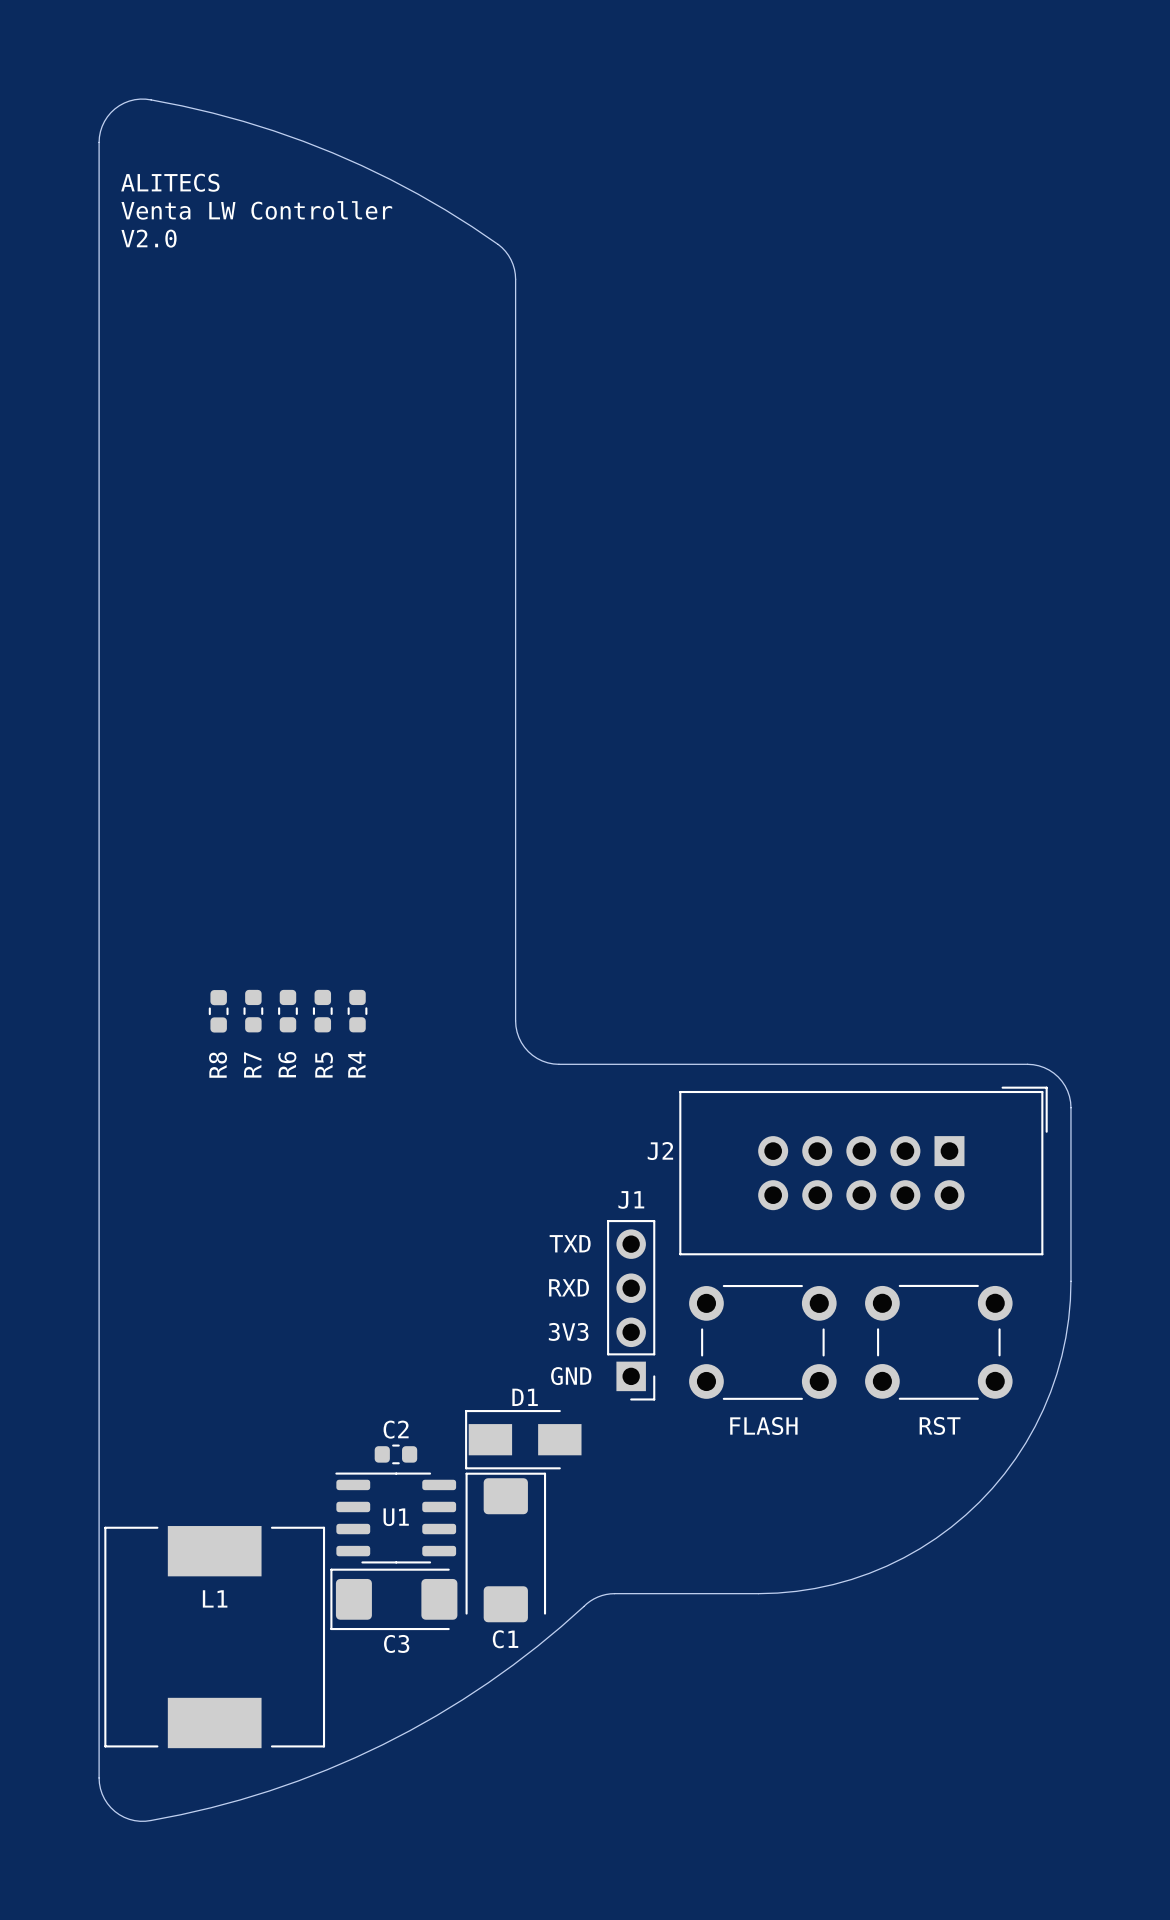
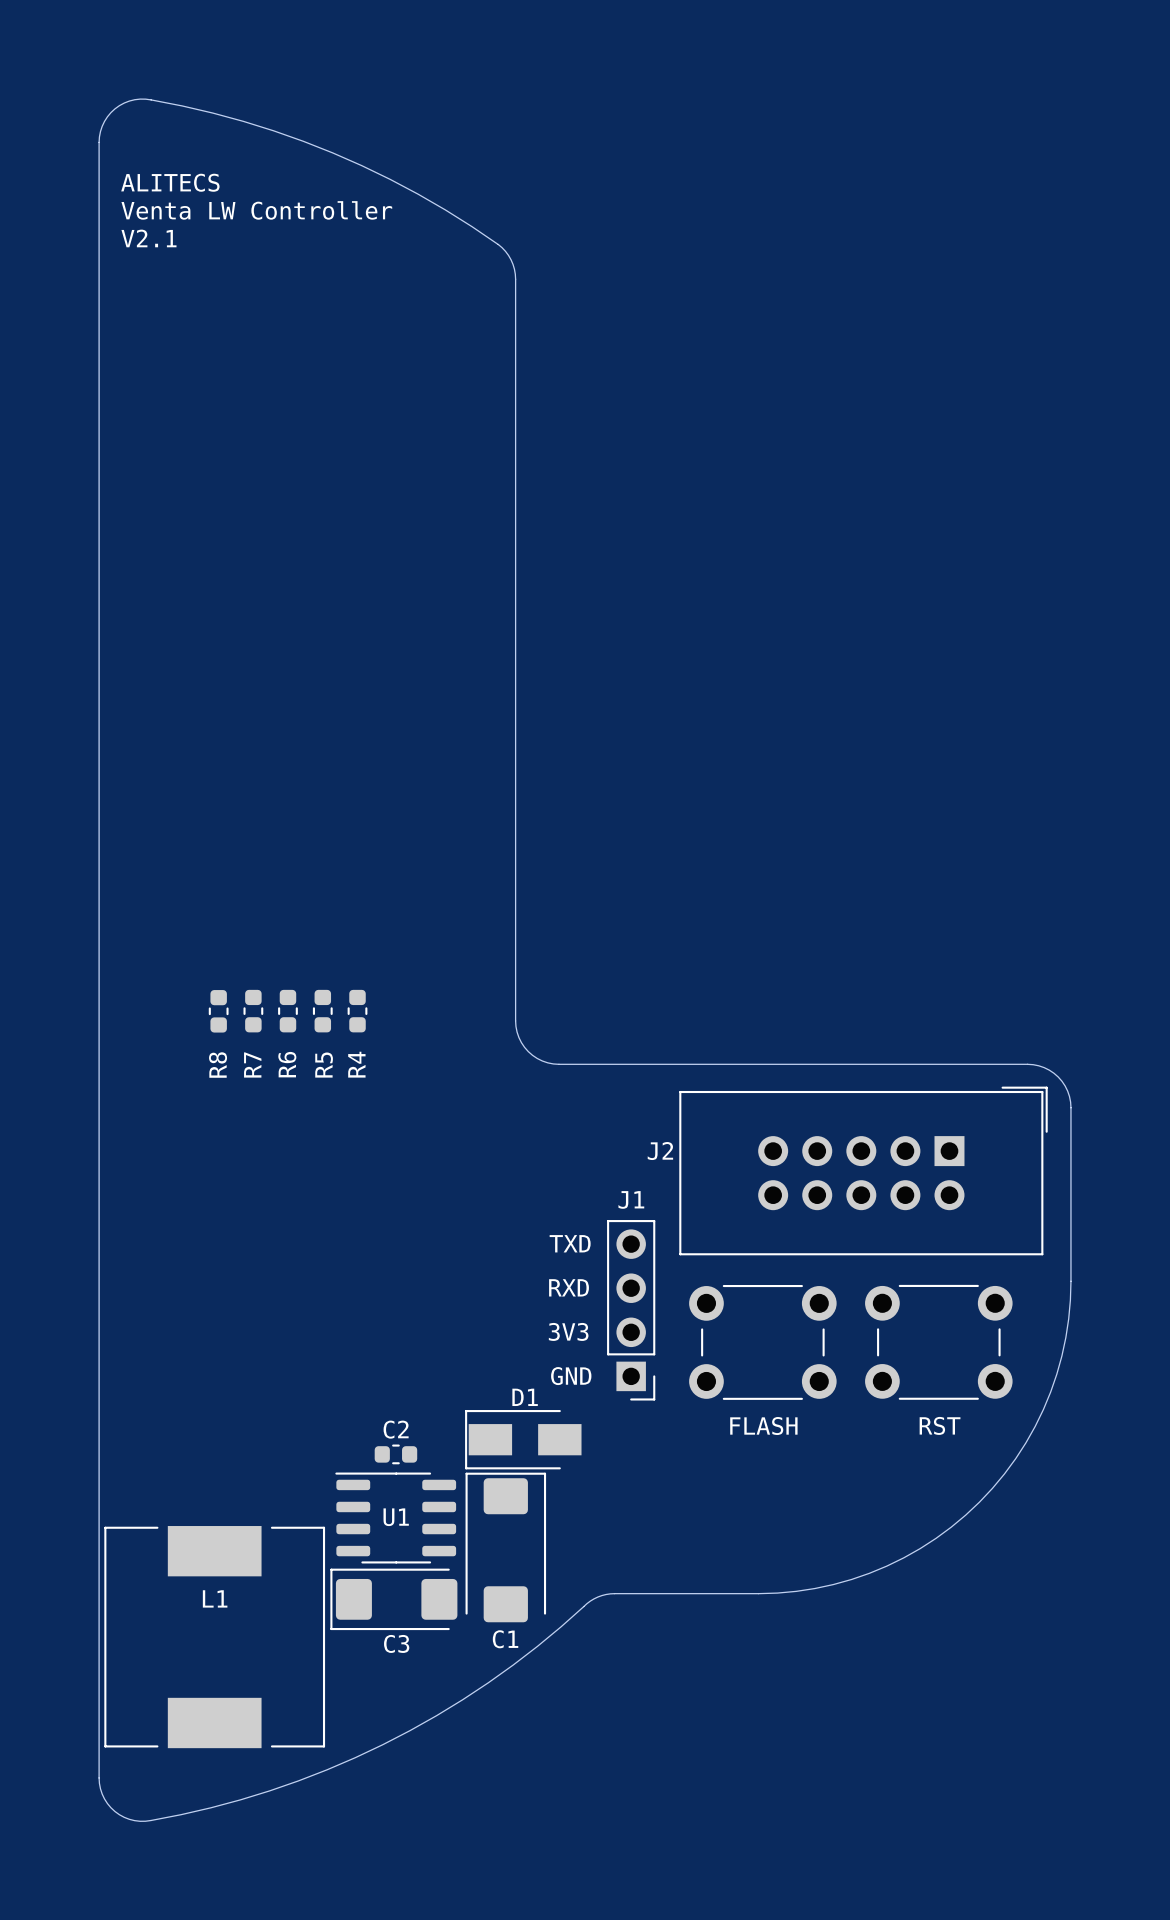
text: V2.0 (149, 238) -> V2.1 (148, 238)

